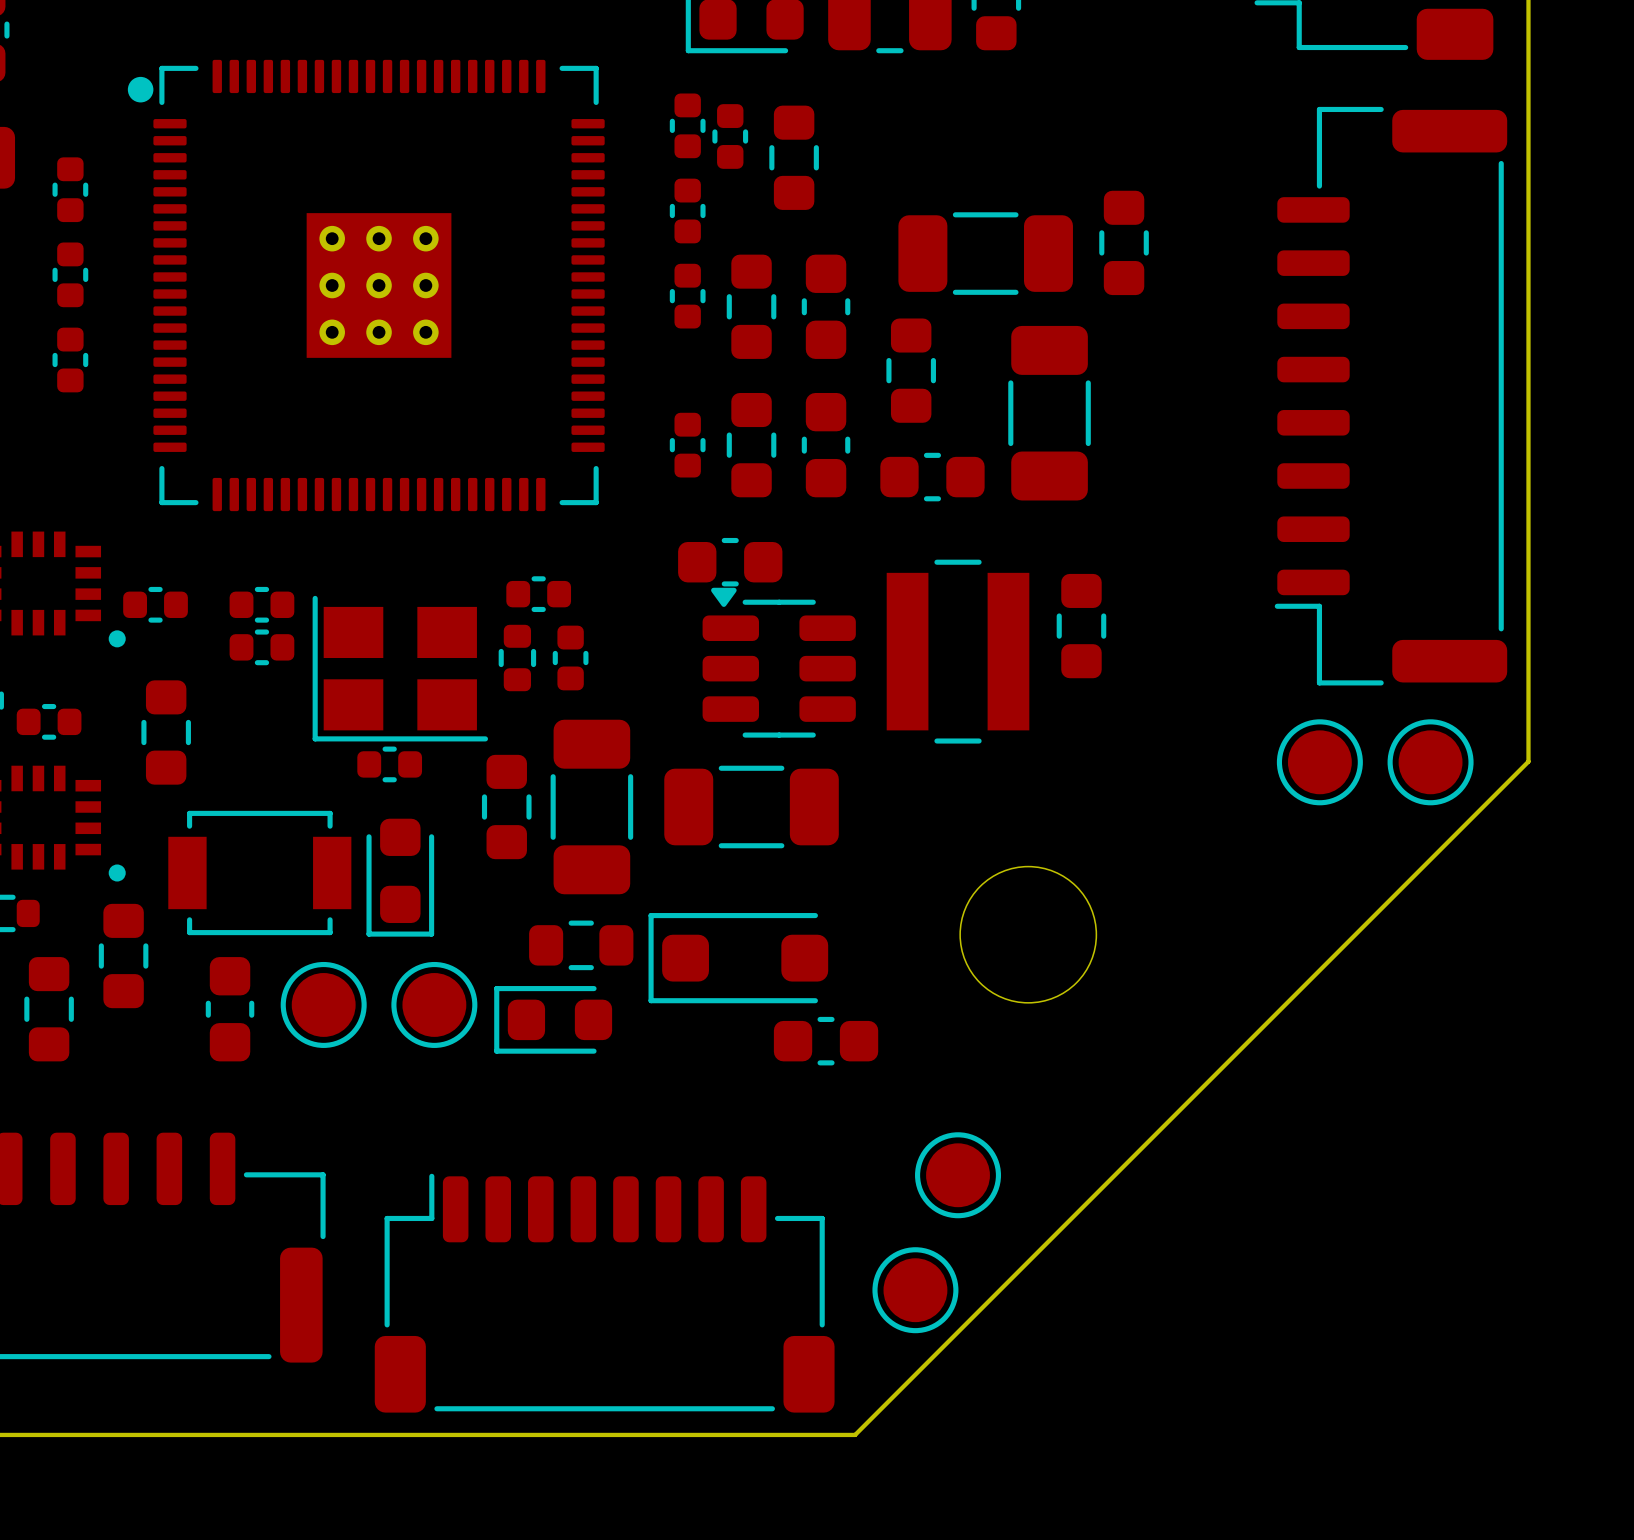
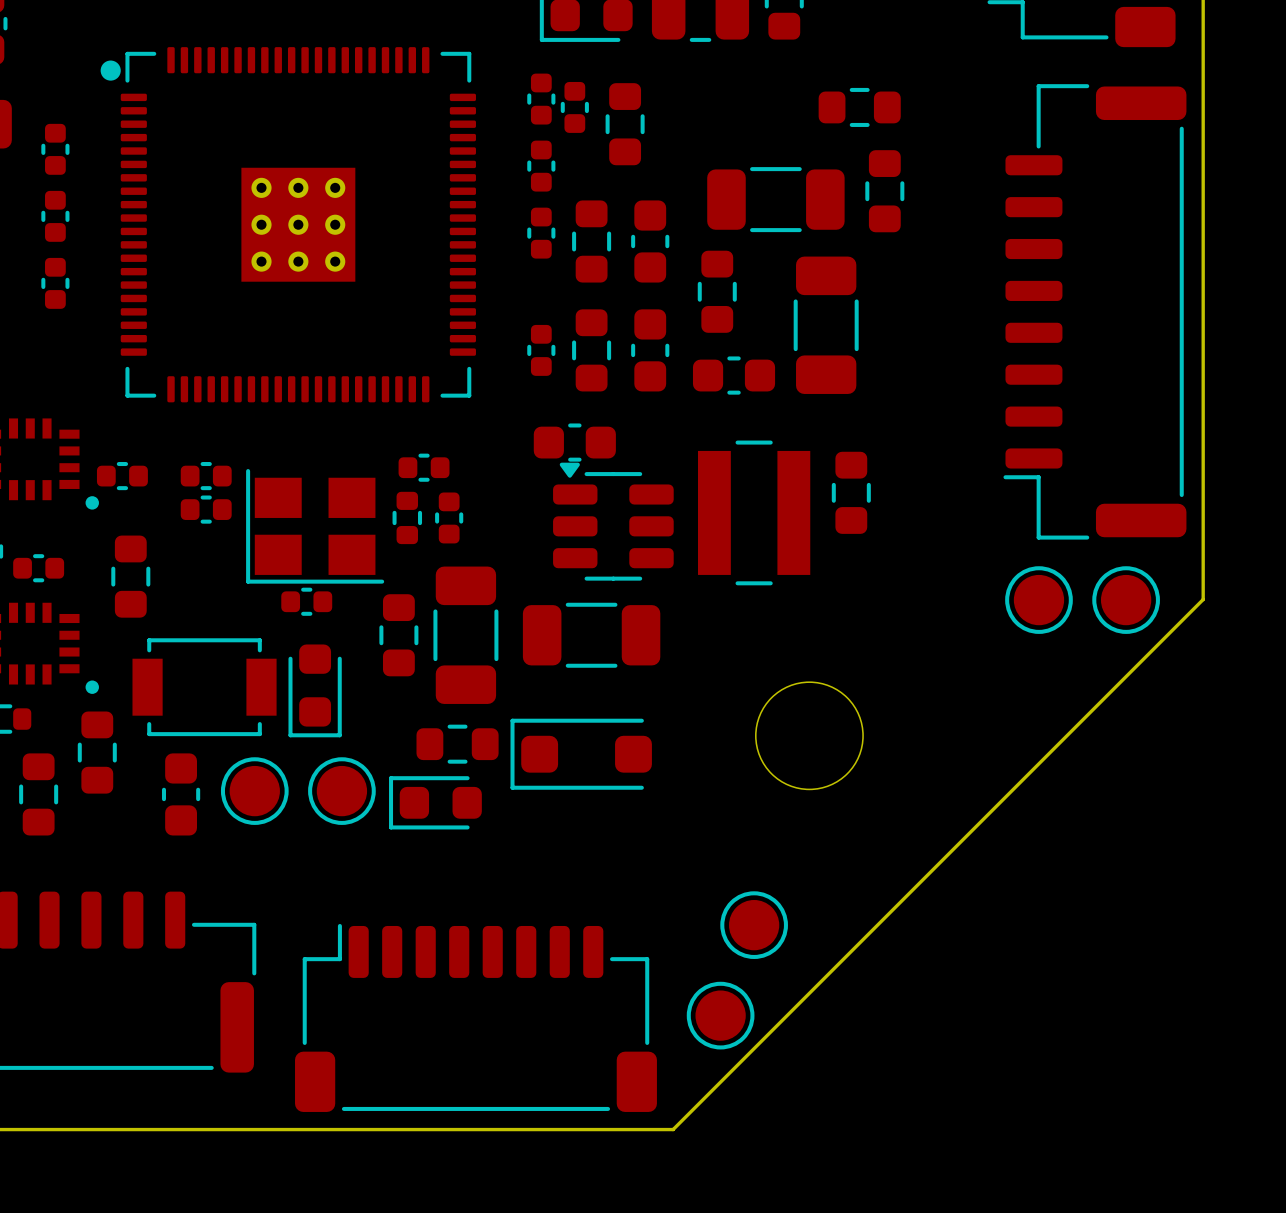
part: none -> (859, 107)
part: (826, 1041) -> none

